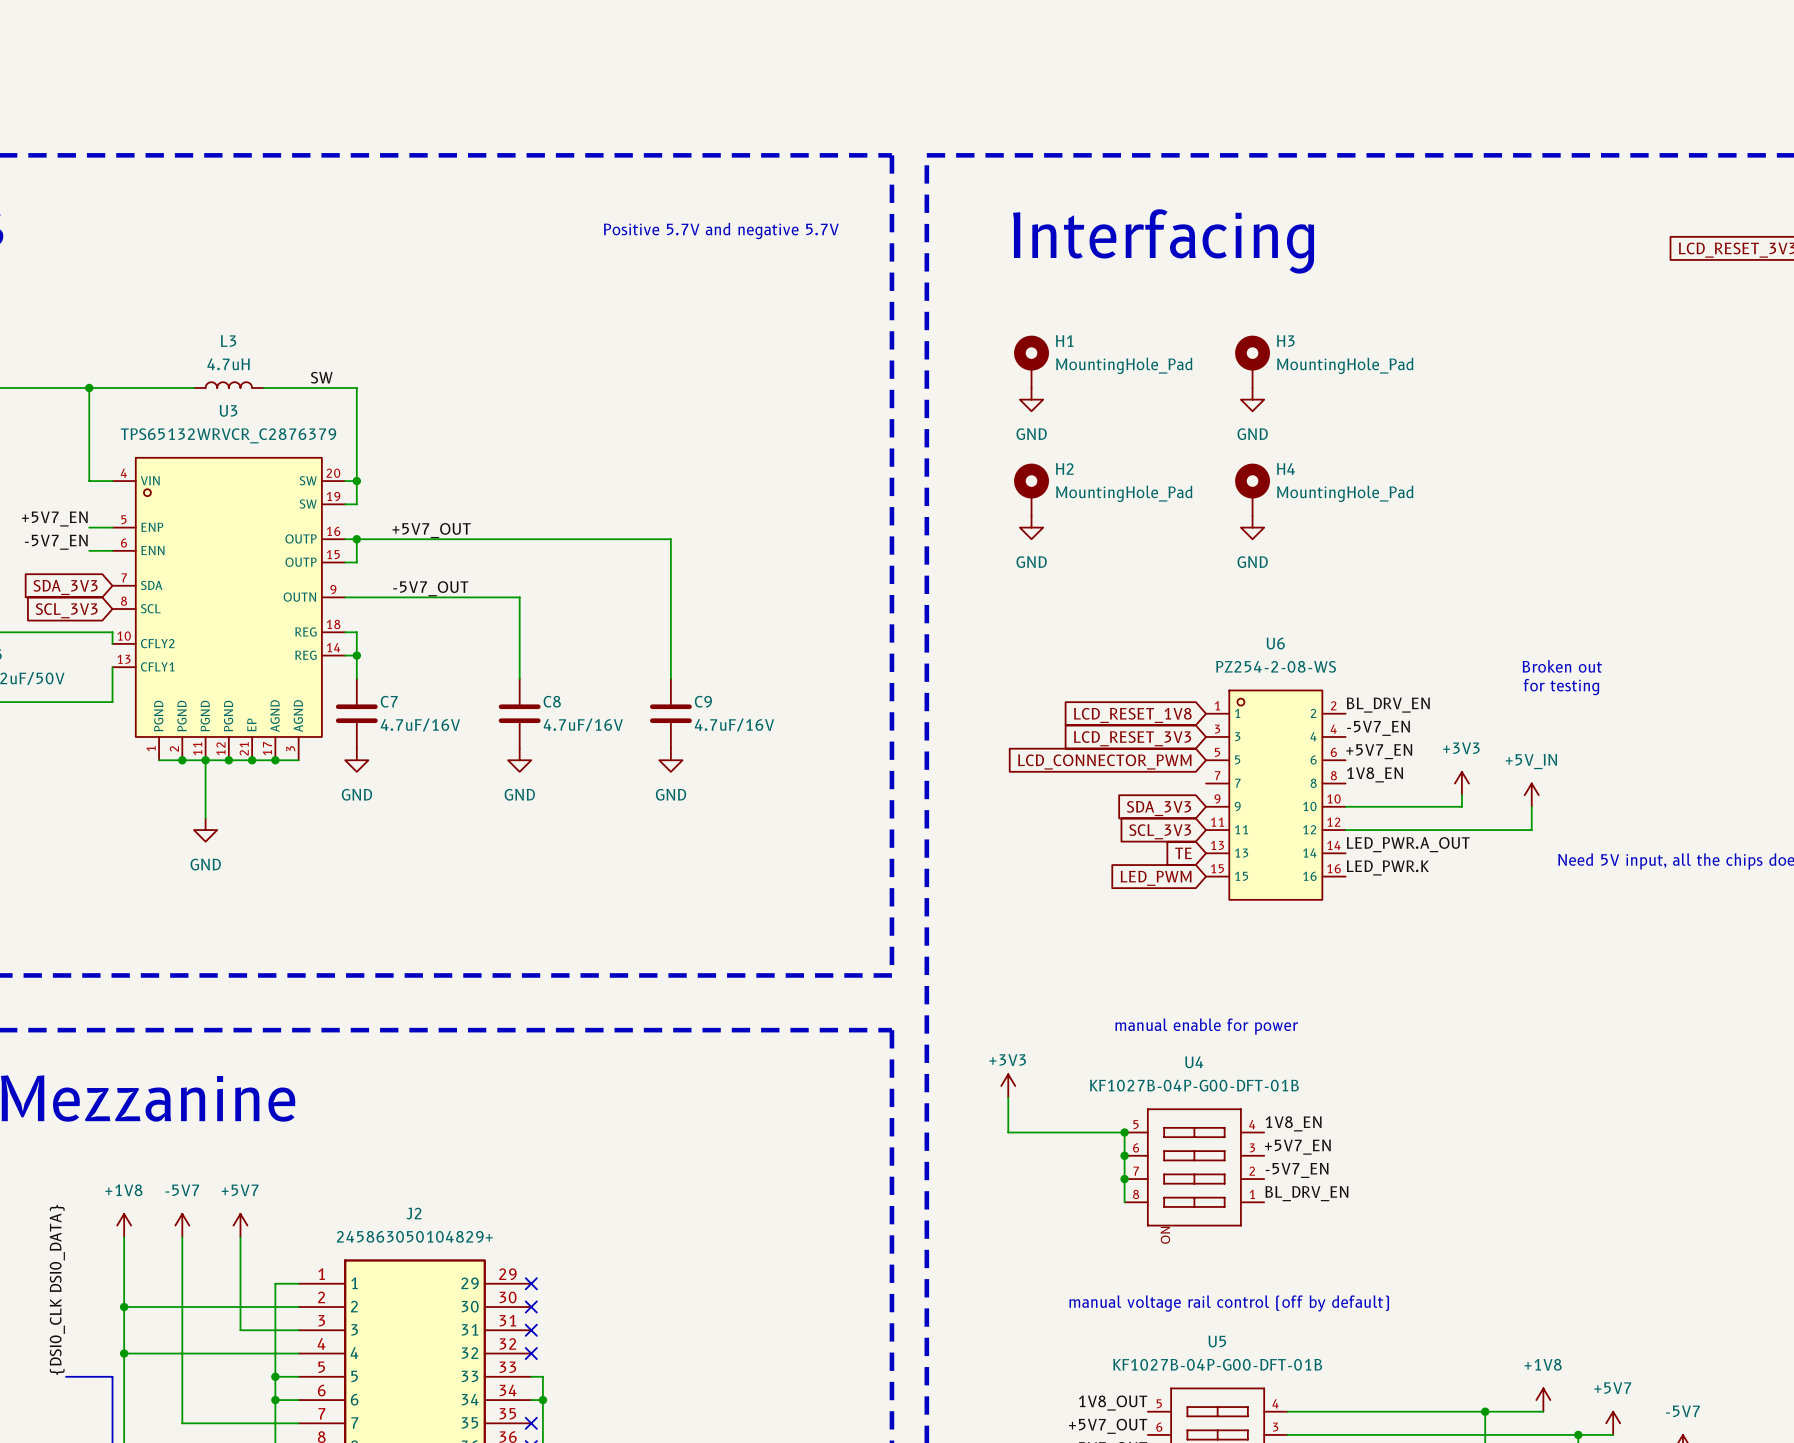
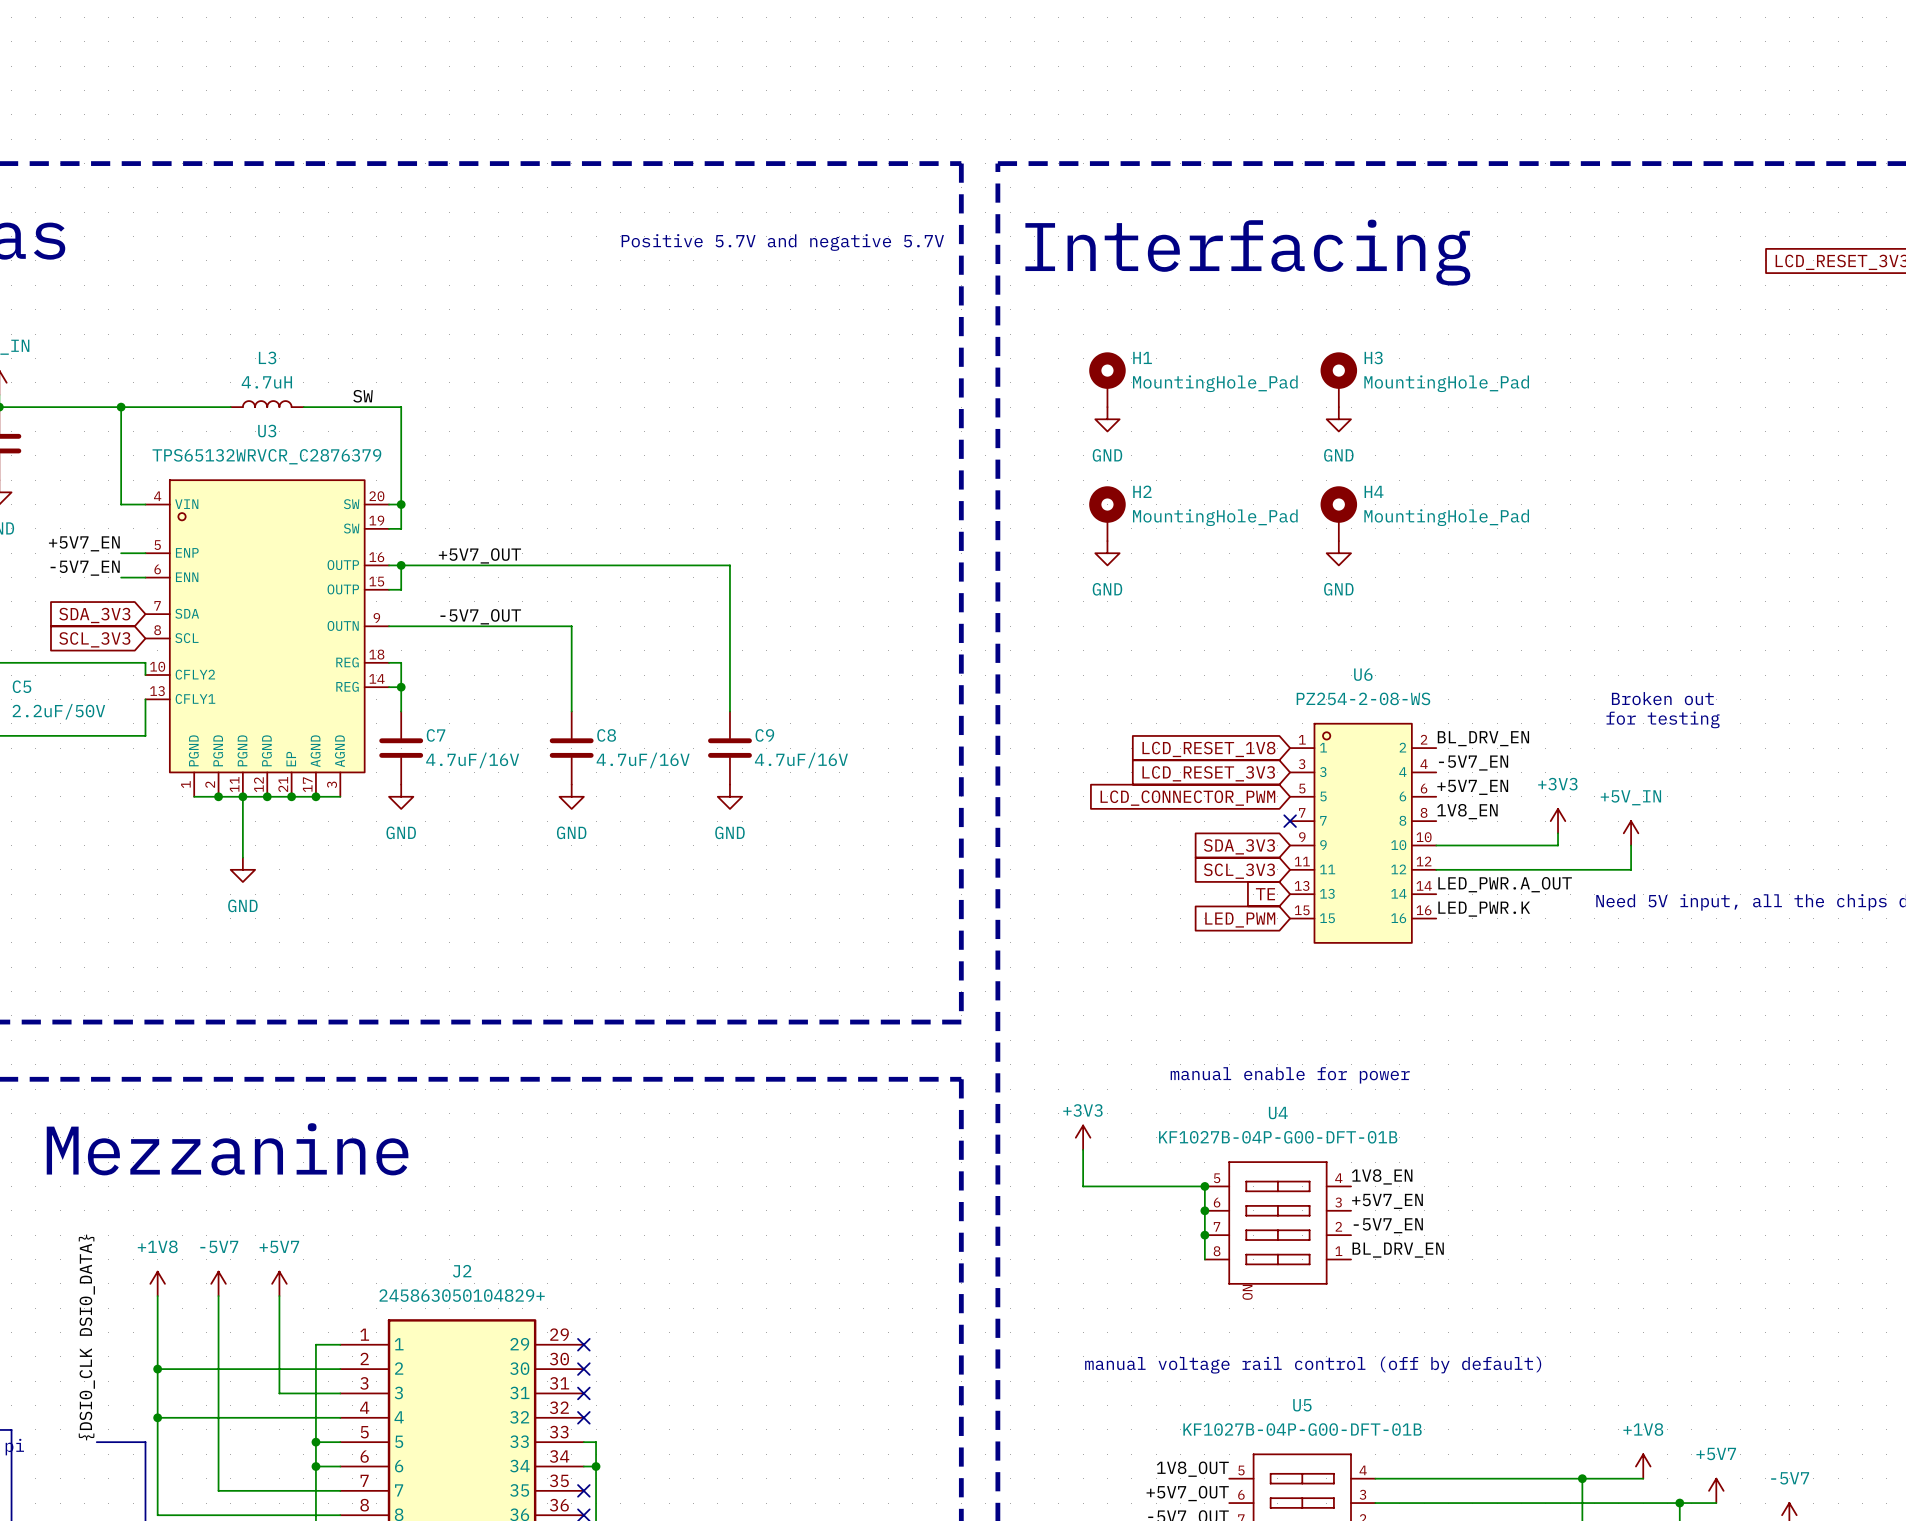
no-connect mark: none -> (1290, 821)

